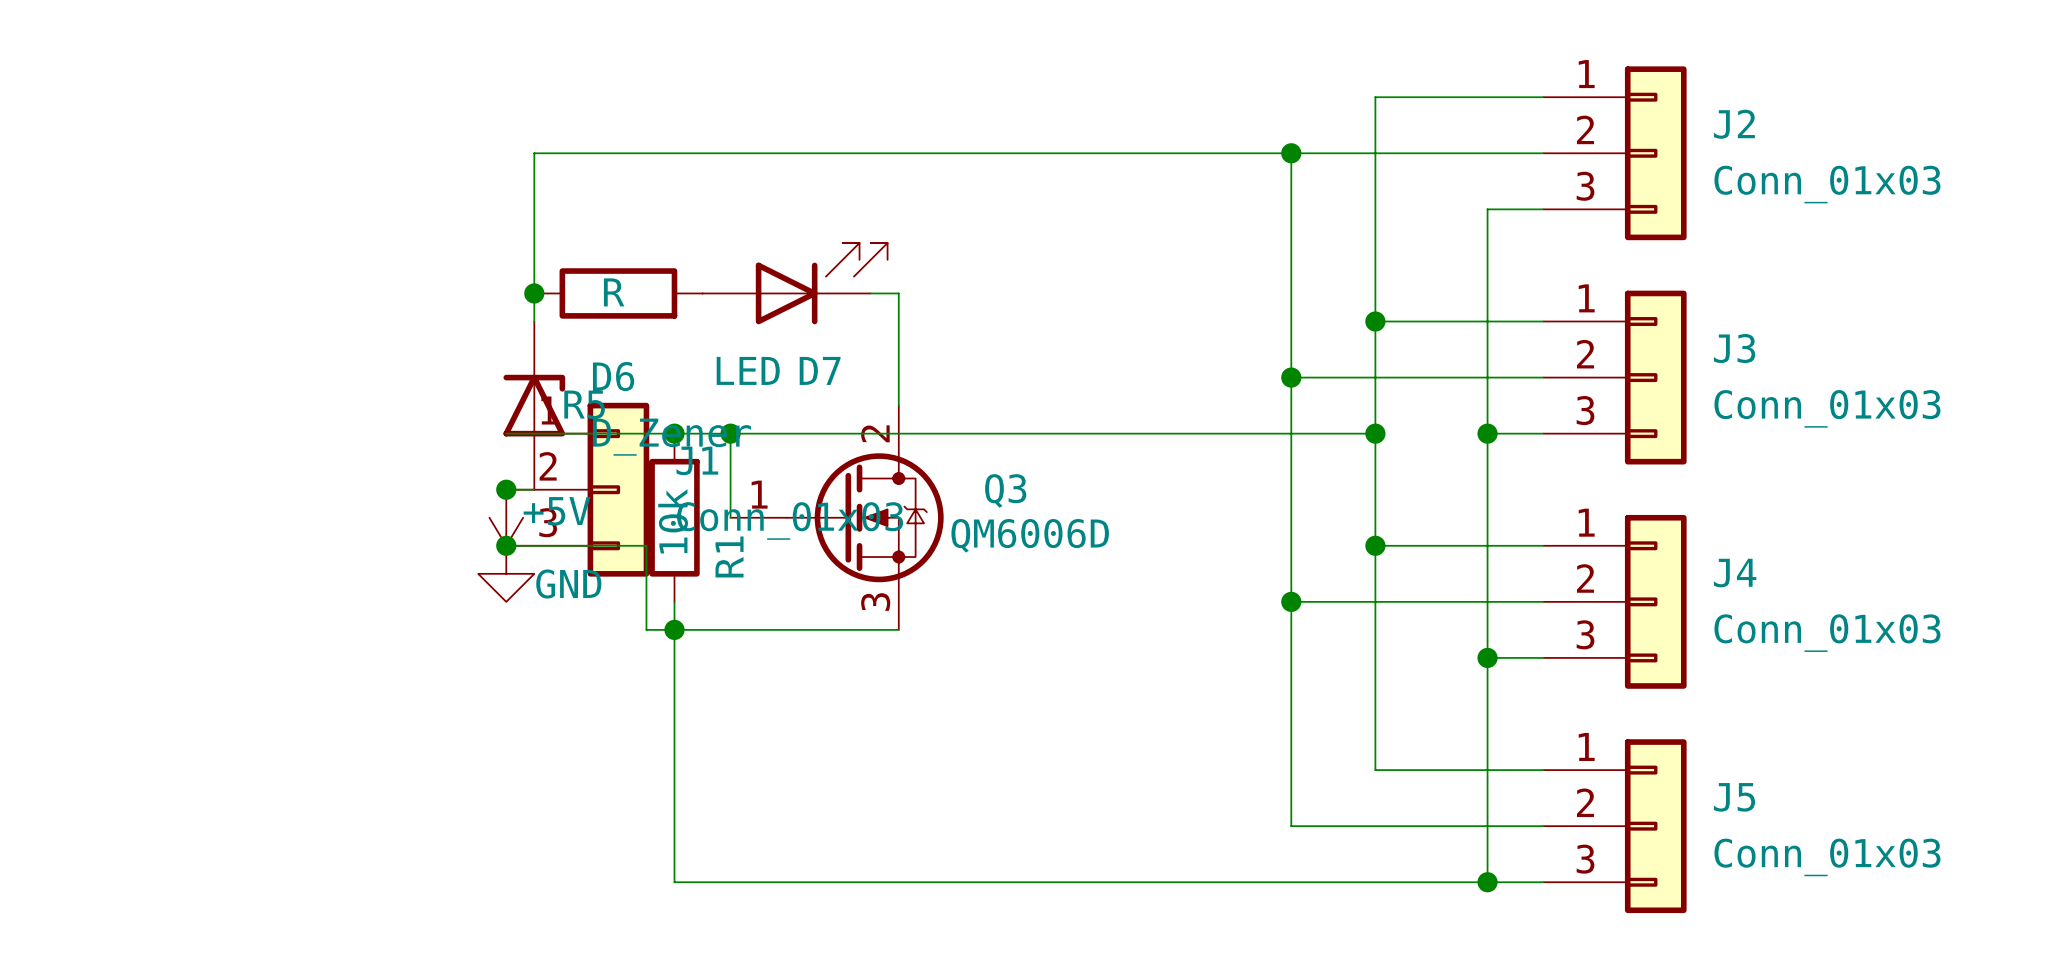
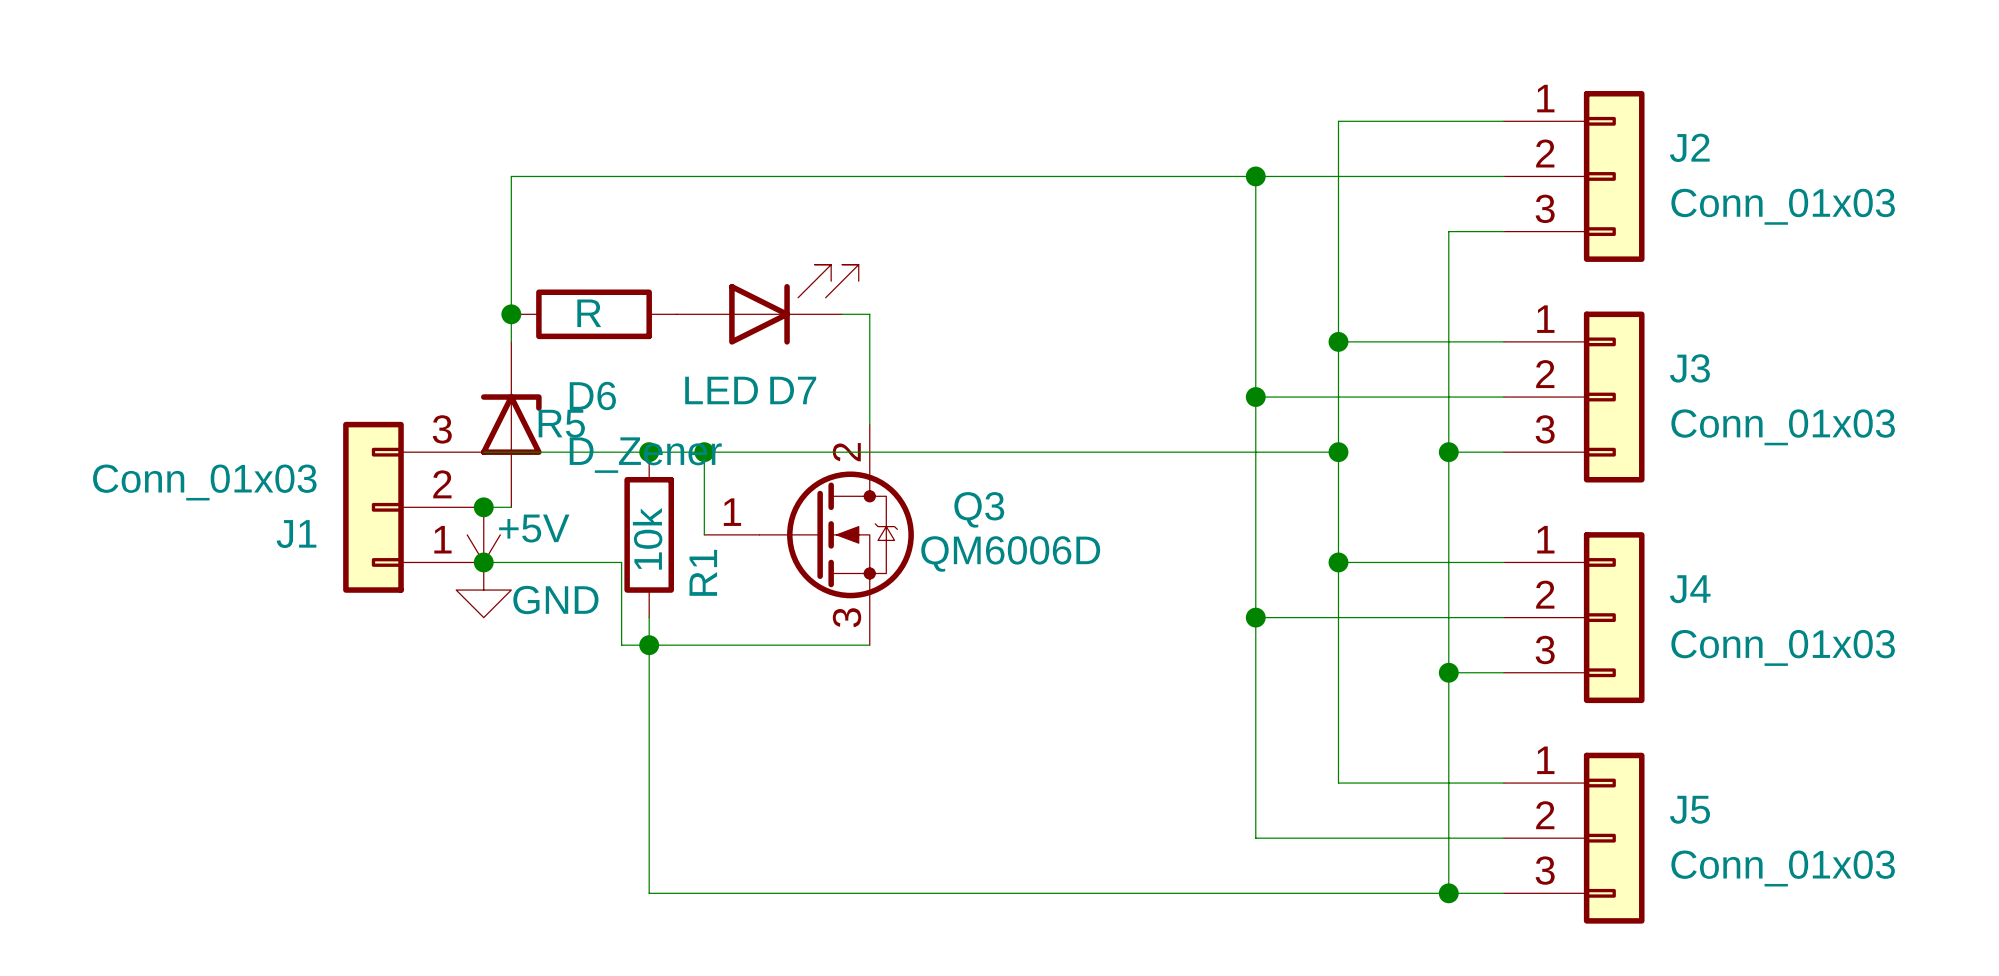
J1 position: (577, 489) -> (413, 507)
J1 rotation: 0° (618, 489) -> 180° (373, 507)

